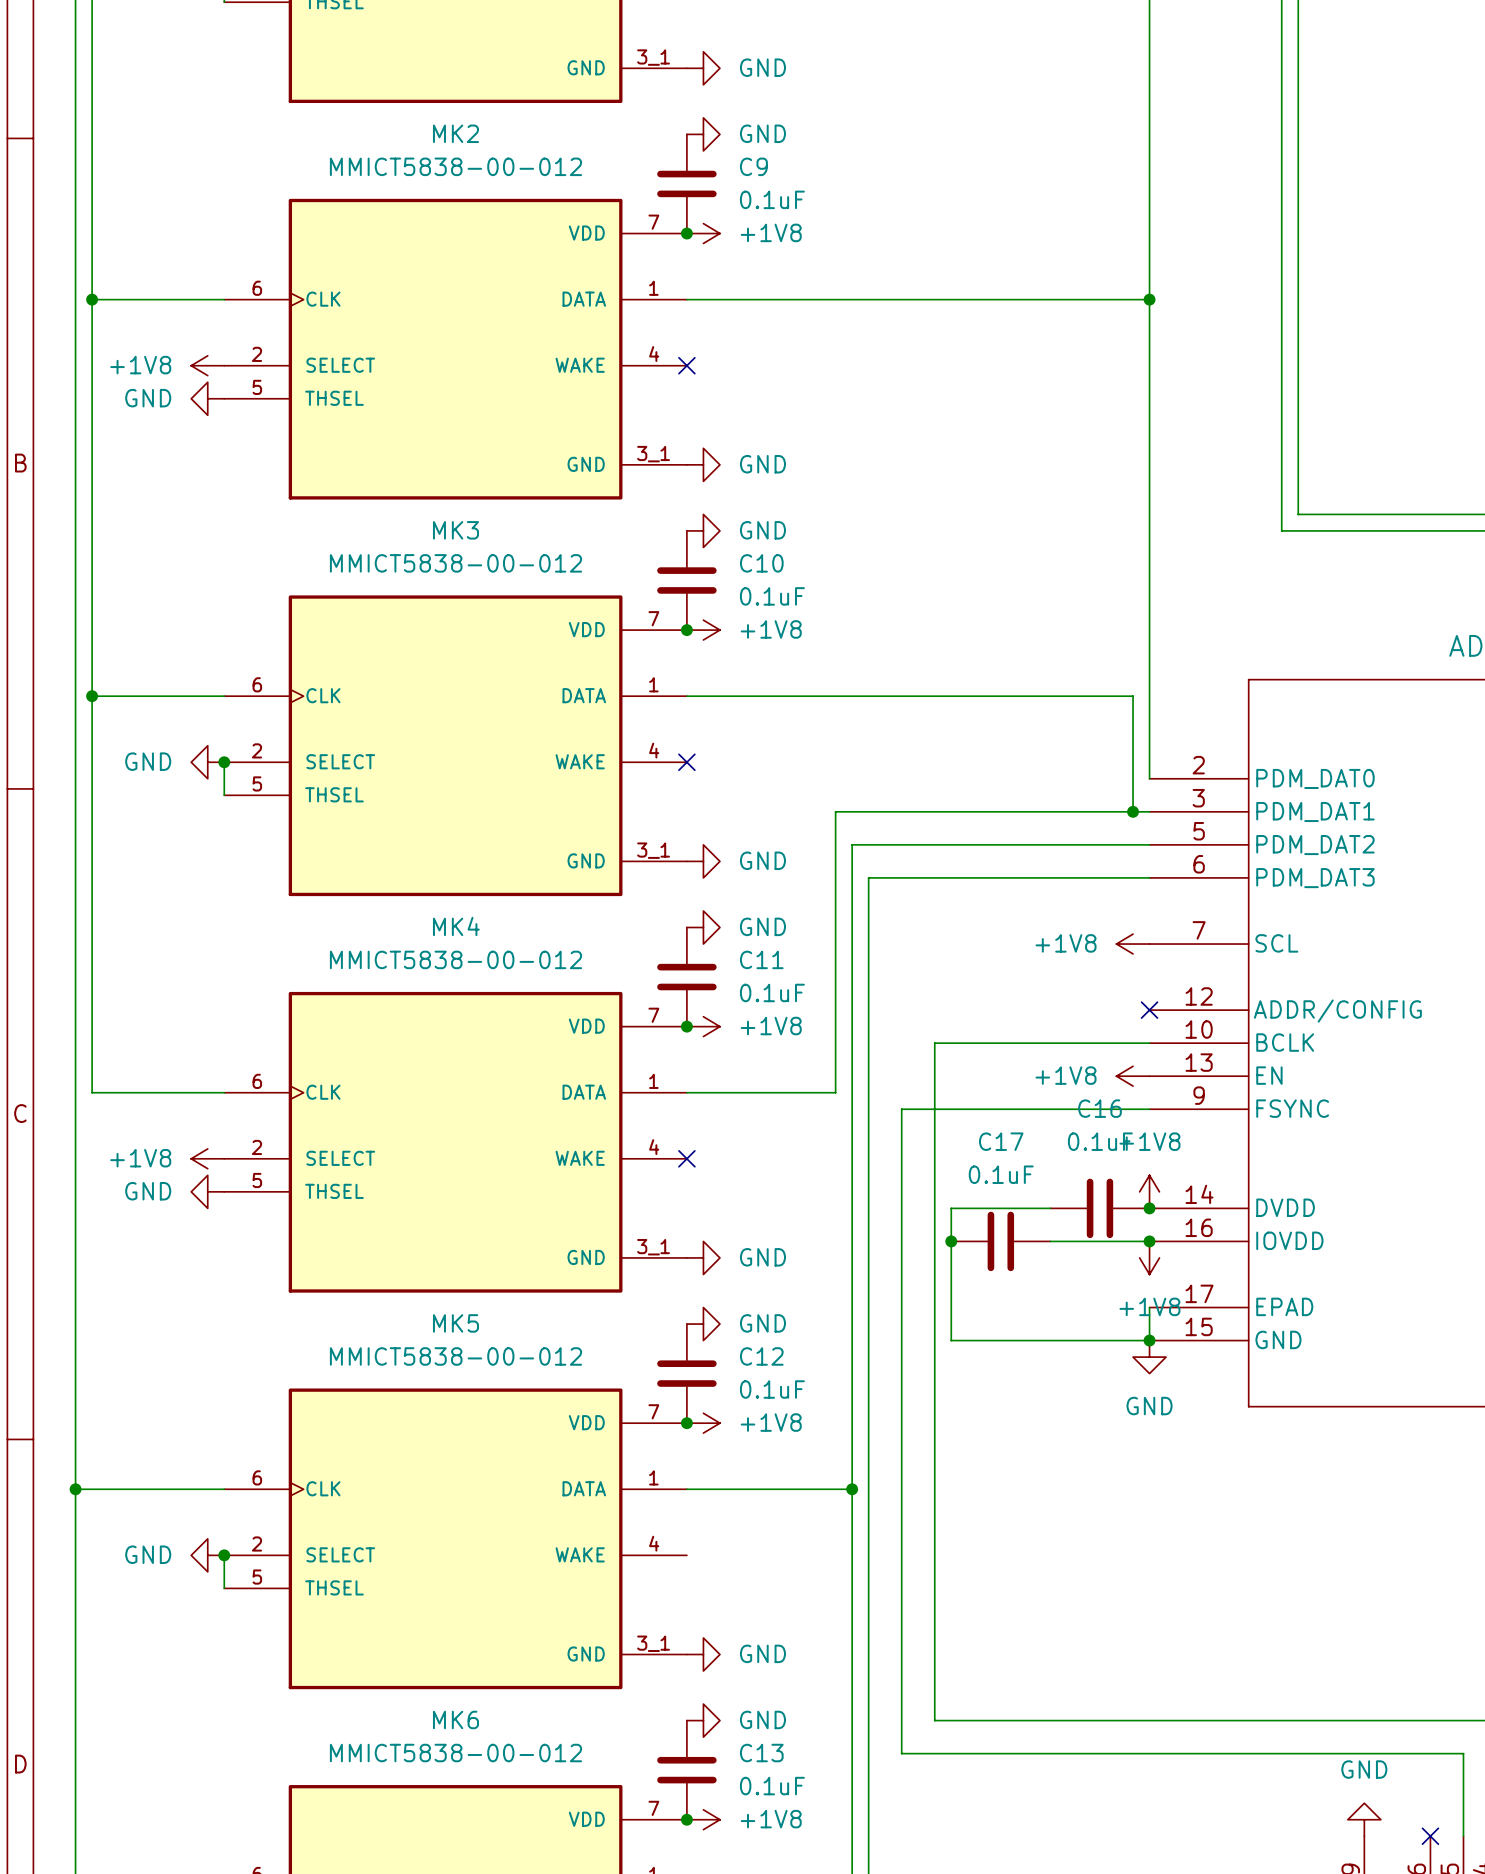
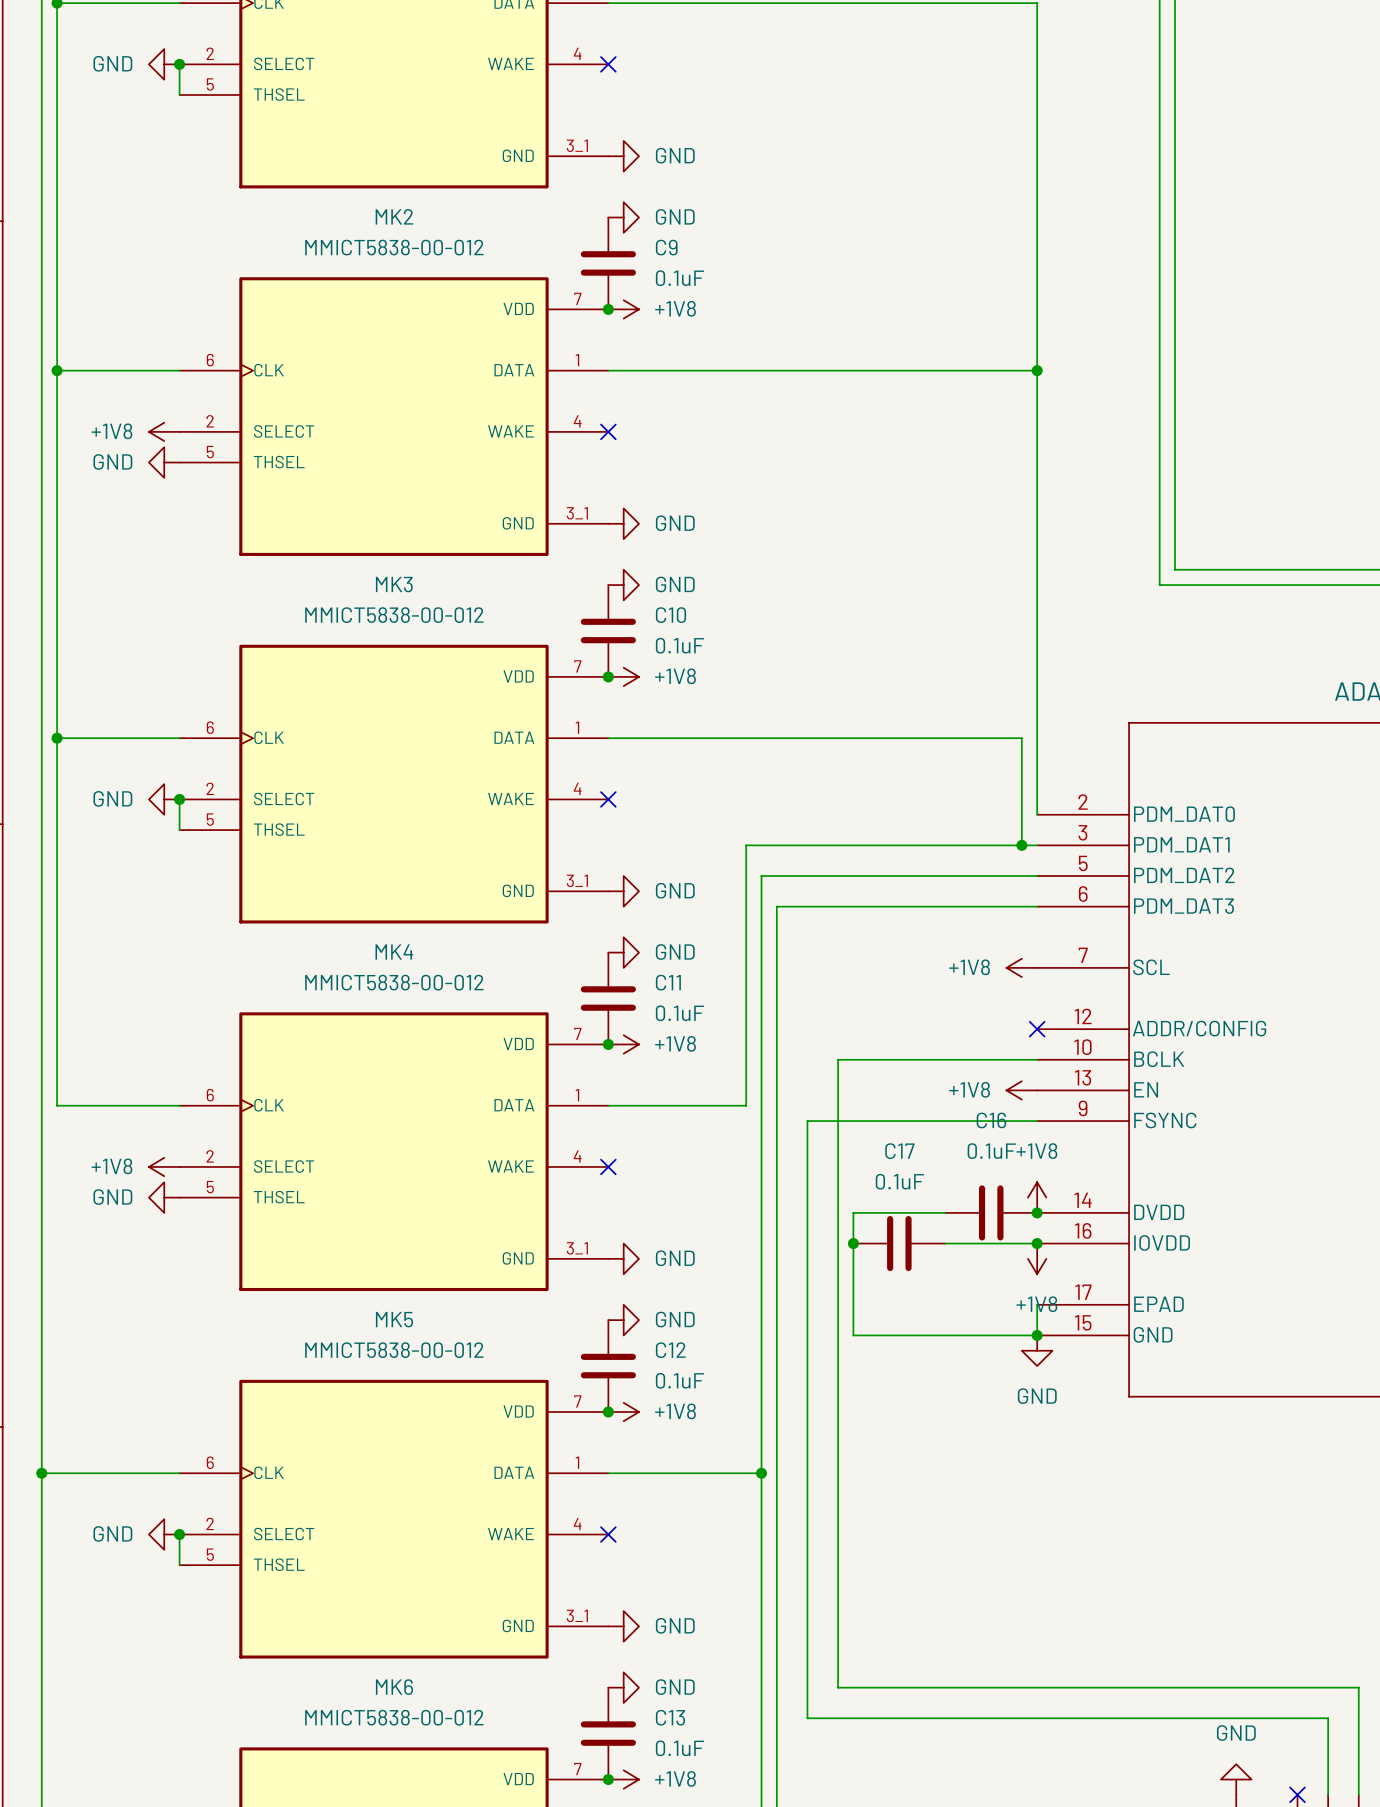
no-connect mark: none -> (608, 1534)

